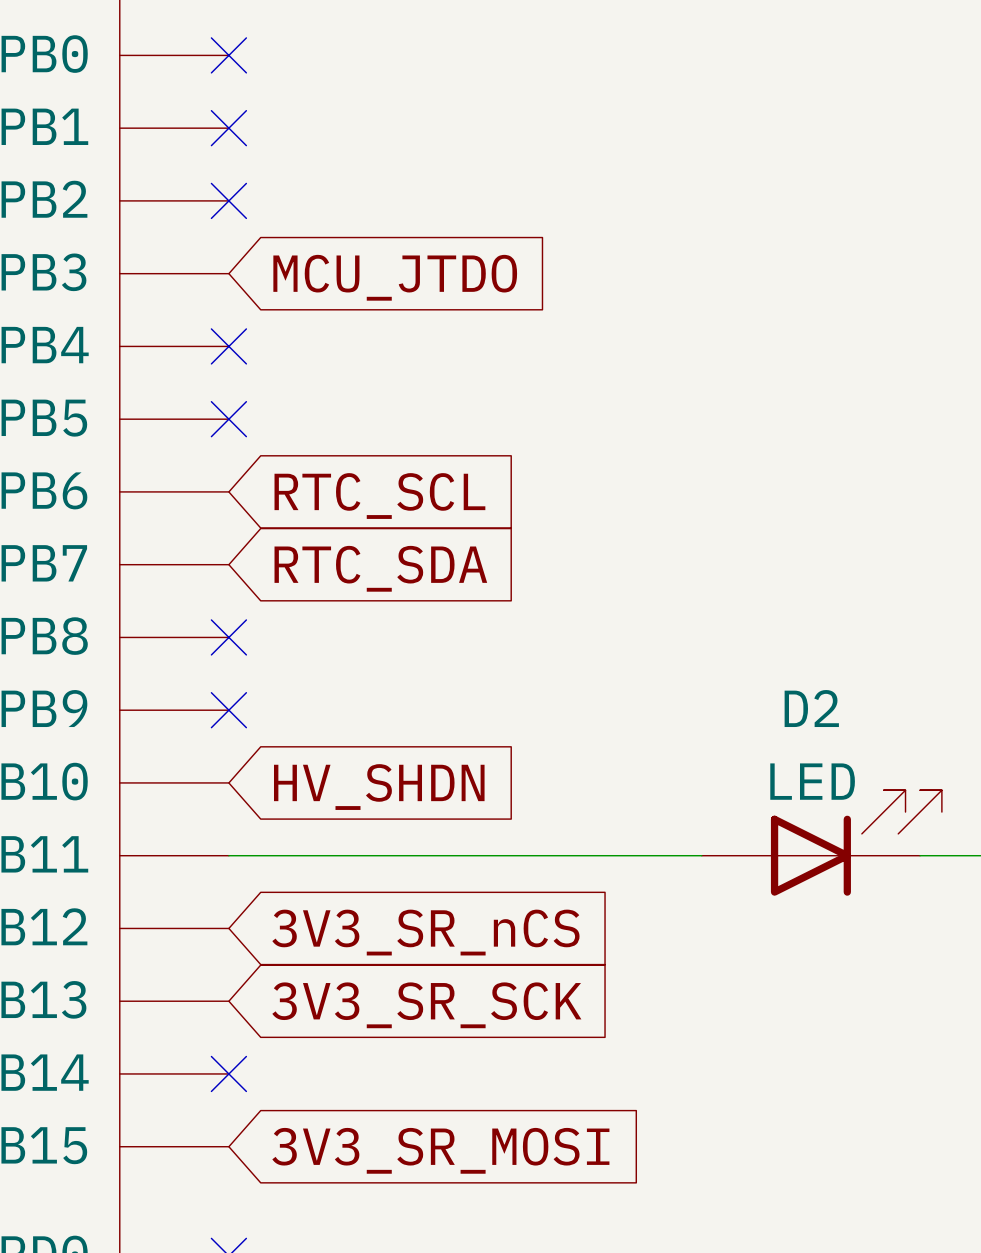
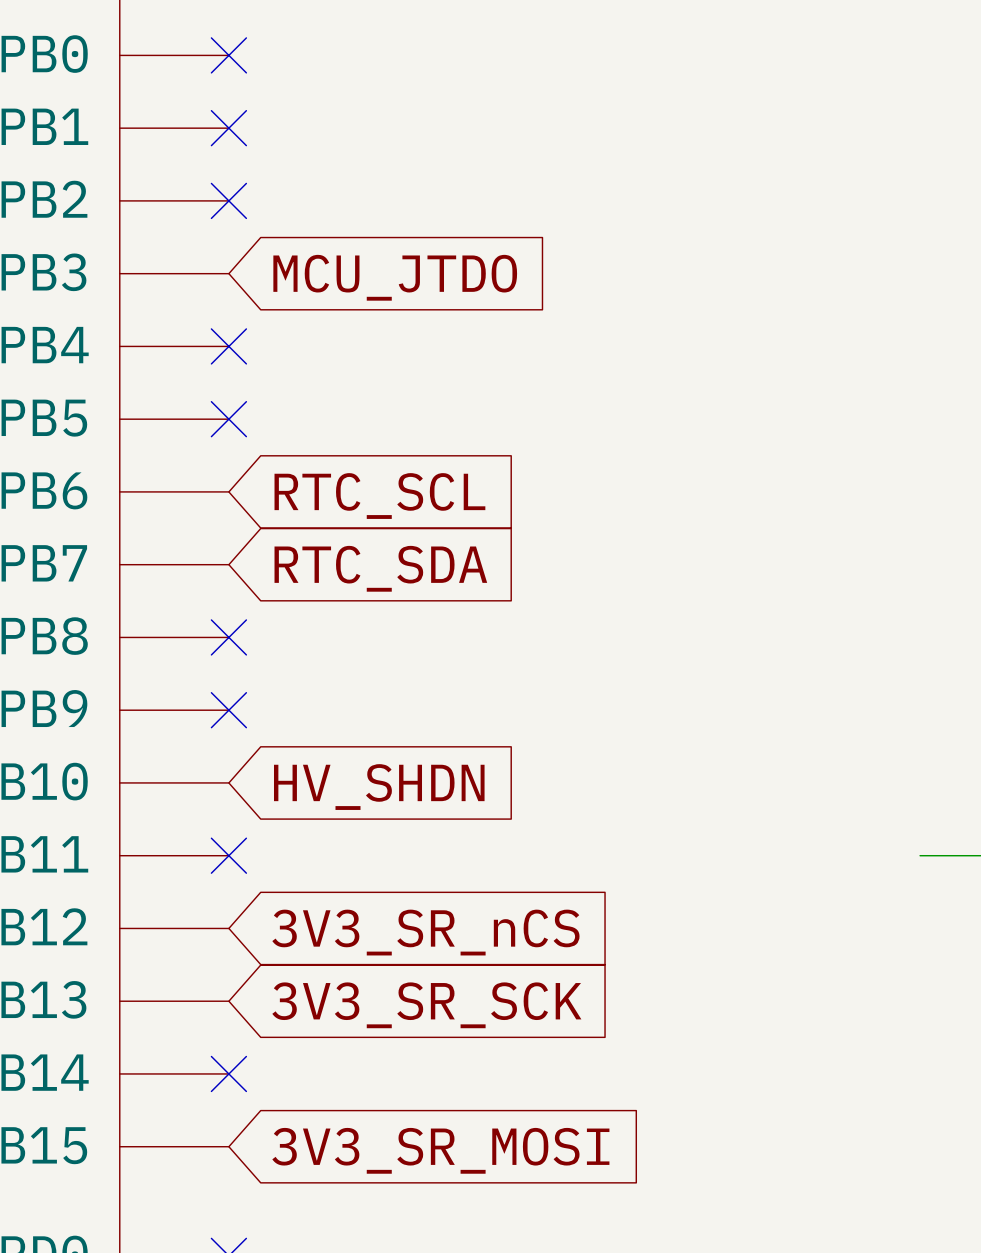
D2: LED (821, 842) -> none
wire: (228, 855) (701, 855) -> none
no-connect mark: none -> (228, 855)

